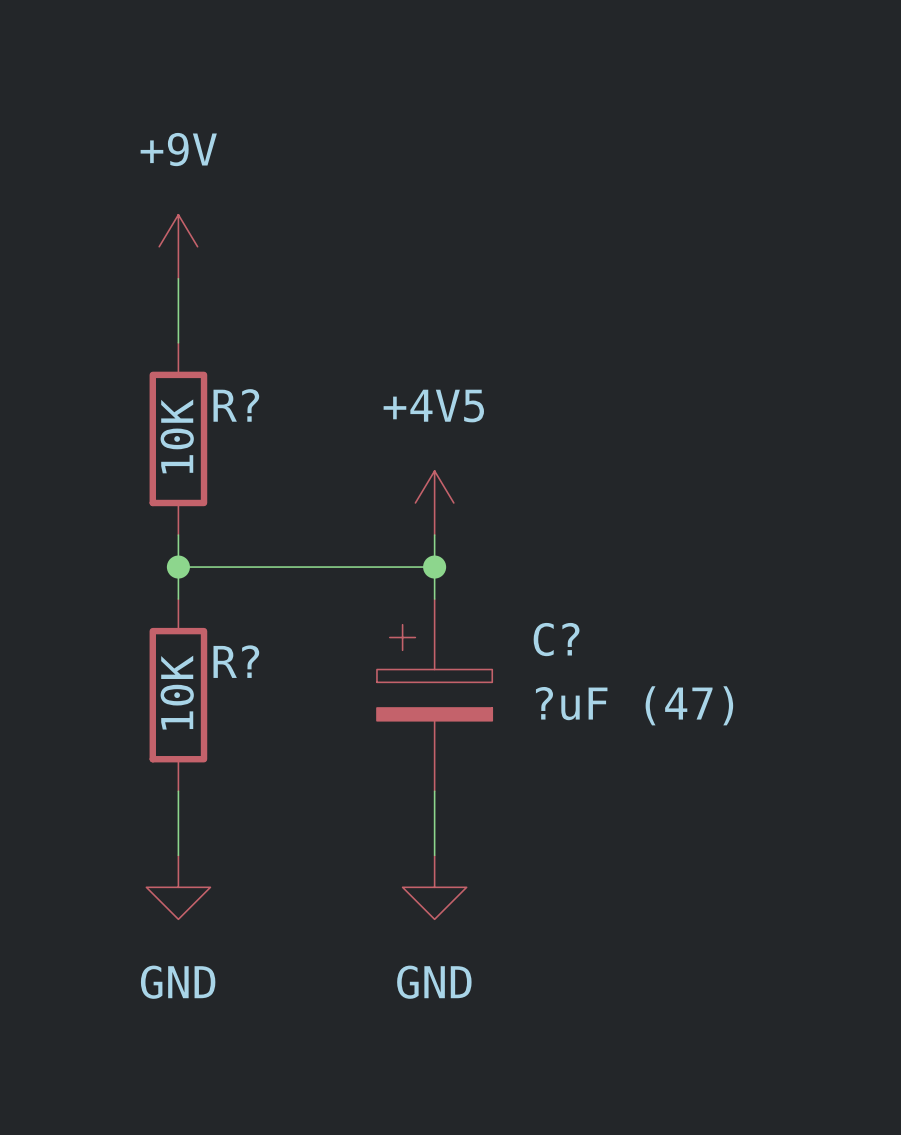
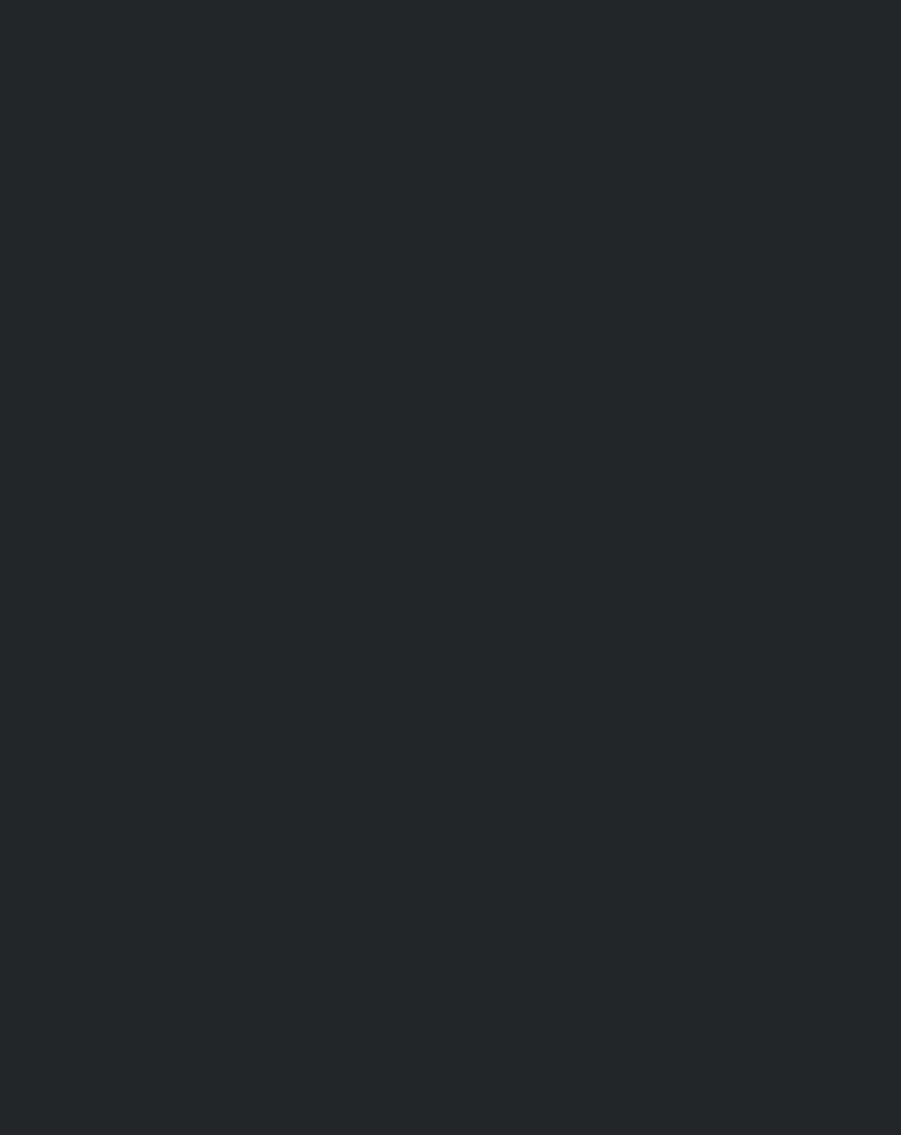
power symbol: +9V (178, 246) -> none
wire: (178, 278) (178, 342) -> none
R?: 10K (178, 438) -> none
power symbol: +4V5 (434, 502) -> none
wire: (178, 535) (178, 599) -> none
wire: (434, 535) (434, 599) -> none
wire: (178, 567) (434, 567) -> none
junction: (178, 567) -> none
junction: (434, 567) -> none
R?: 10K (178, 695) -> none
C?: ?uF (47) (434, 695) -> none
wire: (178, 791) (178, 855) -> none
wire: (434, 791) (434, 855) -> none
power symbol: GND (178, 887) -> none
power symbol: GND (434, 887) -> none

